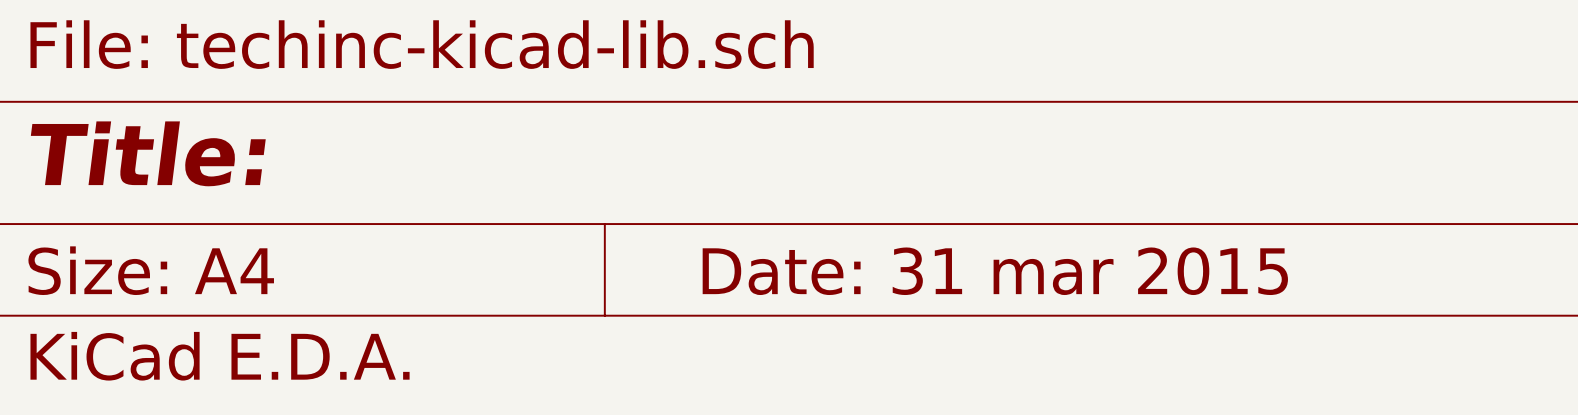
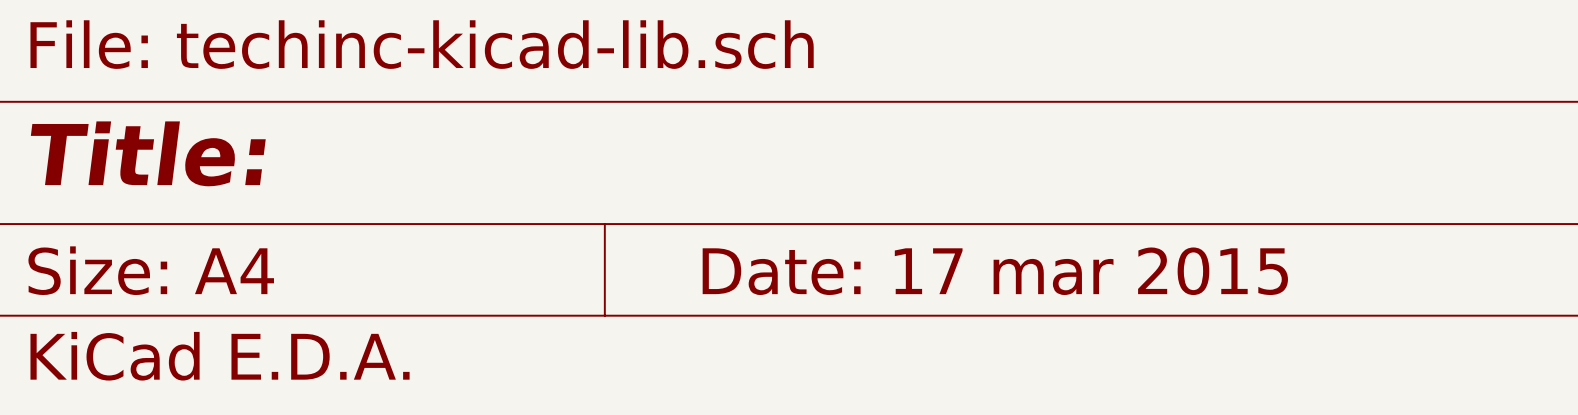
title block: Date: 31 mar 2015 (995, 271) -> Date: 17 mar 2015 (995, 271)

